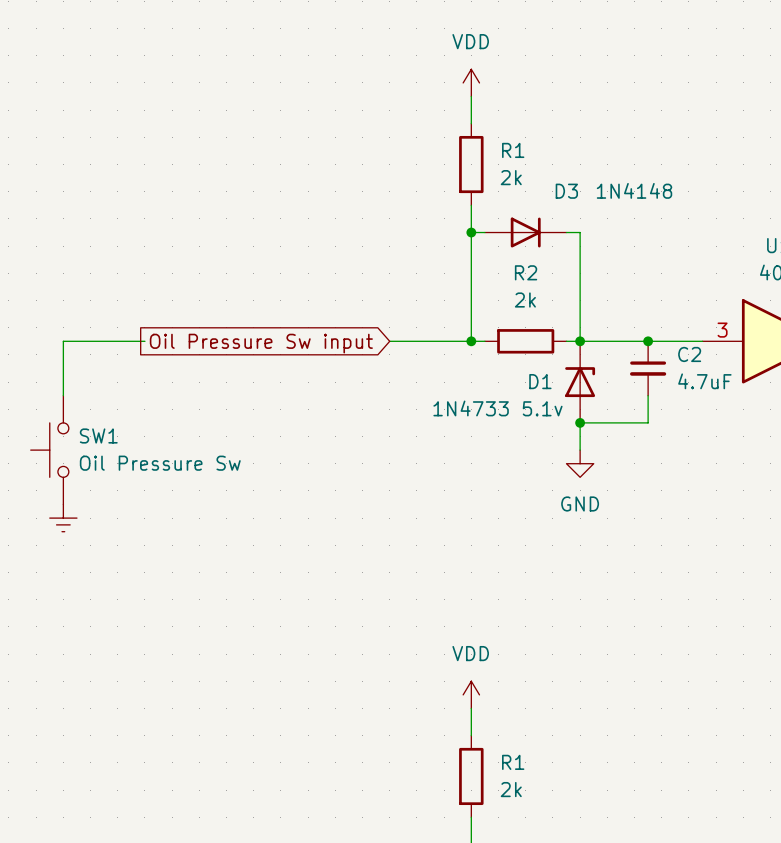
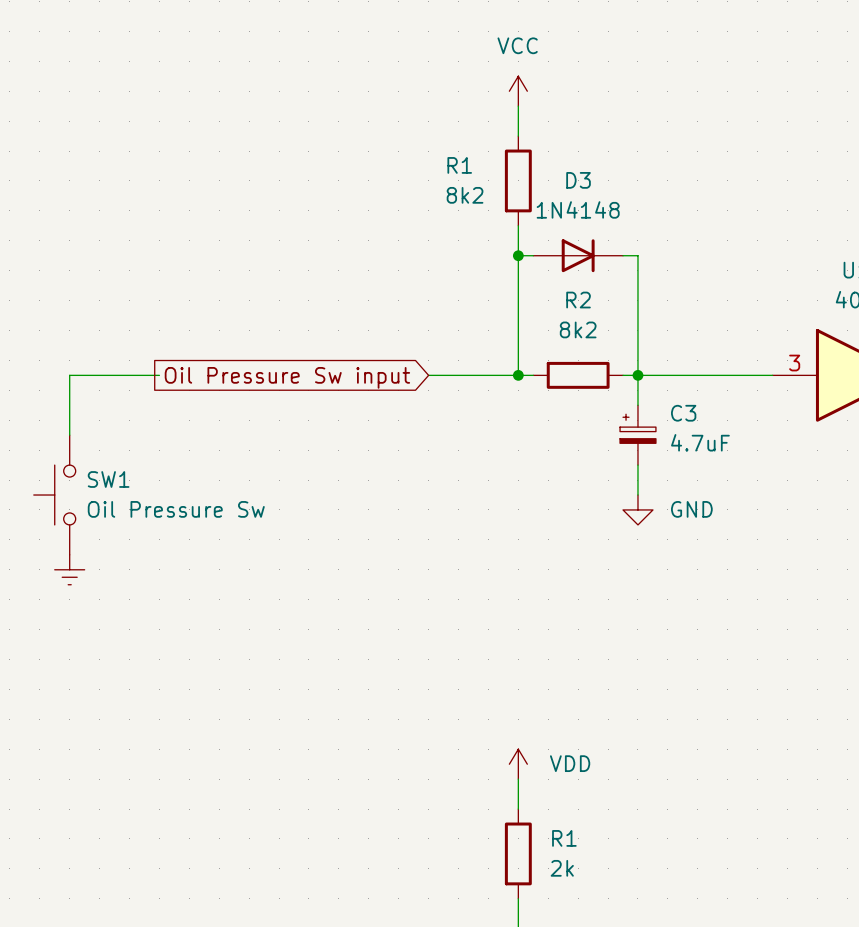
power symbol: VDD (471, 82) -> VCC (518, 91)
R1 name position: R1 (513, 150) -> R1 (459, 165)
R1 value: 2k (511, 177) -> 8k2 (465, 195)
D3 value position: 1N4148 (634, 190) -> 1N4148 (578, 209)
D3 name position: D3 (566, 191) -> D3 (578, 180)
R2 value: 2k (525, 300) -> 8k2 (578, 329)
junction: (648, 341) -> none
C2: 4.7uF (648, 368) -> none
D1: 1N4733 5.1v (580, 382) -> none
C3: none -> 4.7uF (637, 435)
wire: (648, 395) (648, 422) (580, 422) -> none
junction: (580, 422) -> none
power symbol text position: GND (580, 503) -> GND (691, 509)
power symbol text position: VDD (470, 653) -> VDD (570, 763)

